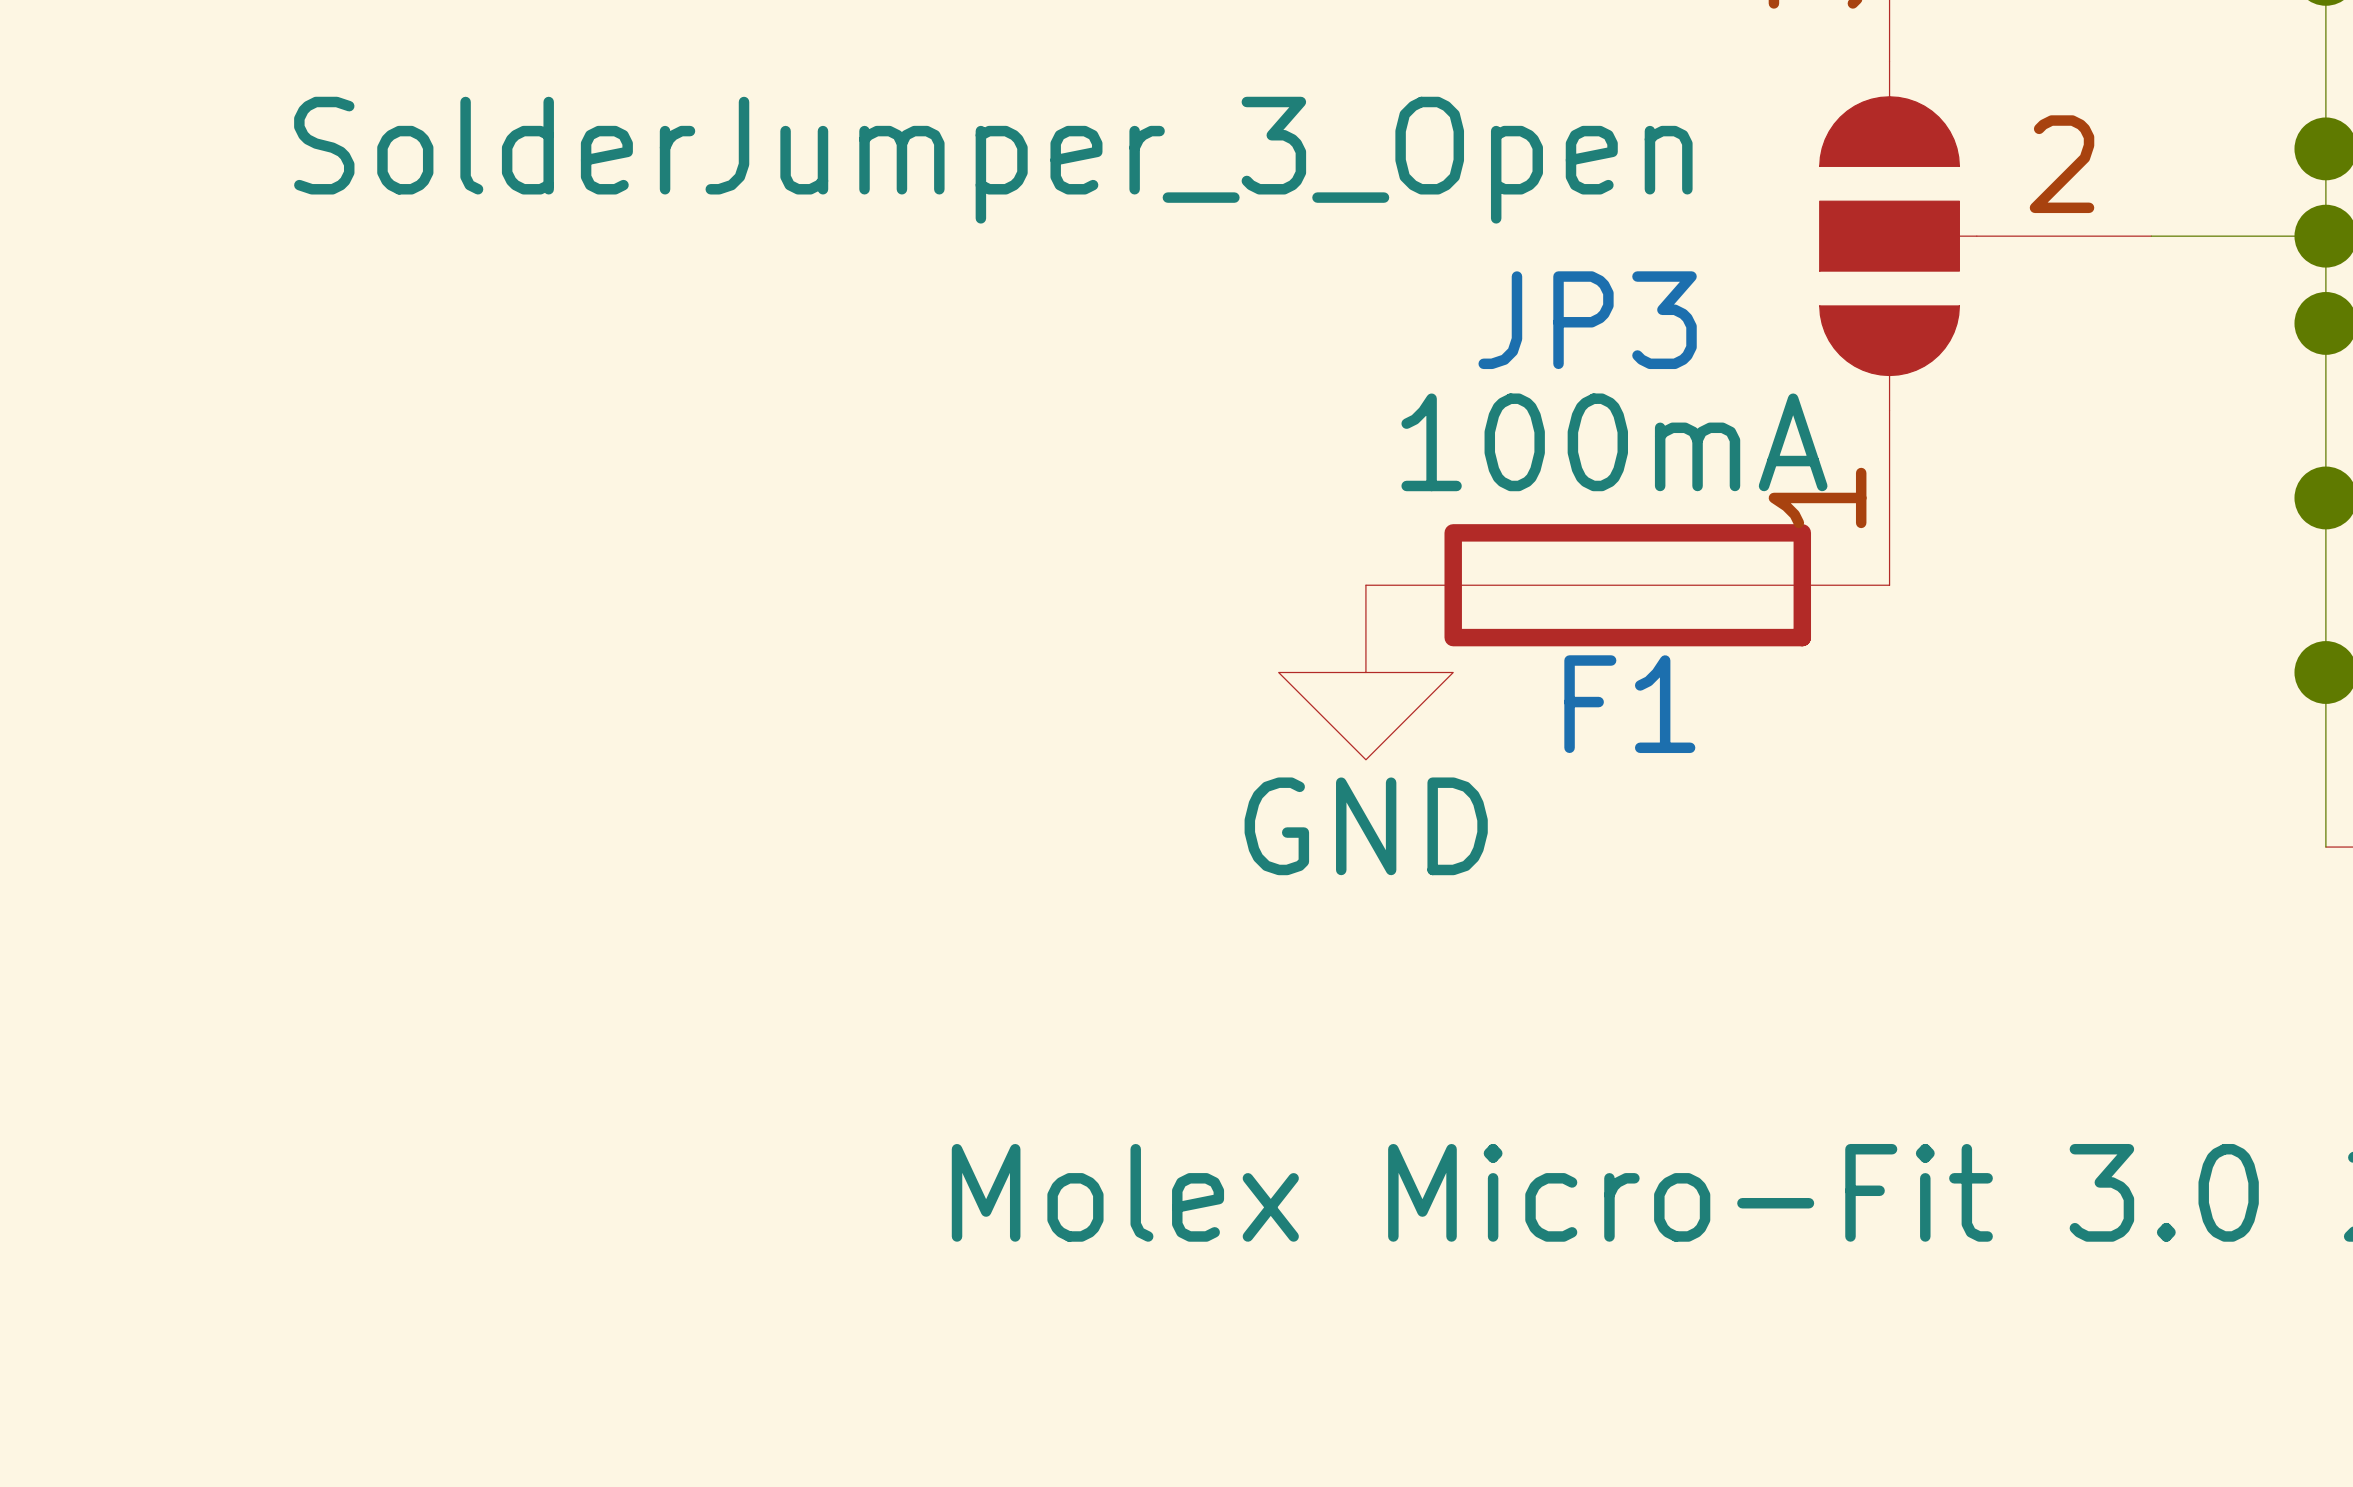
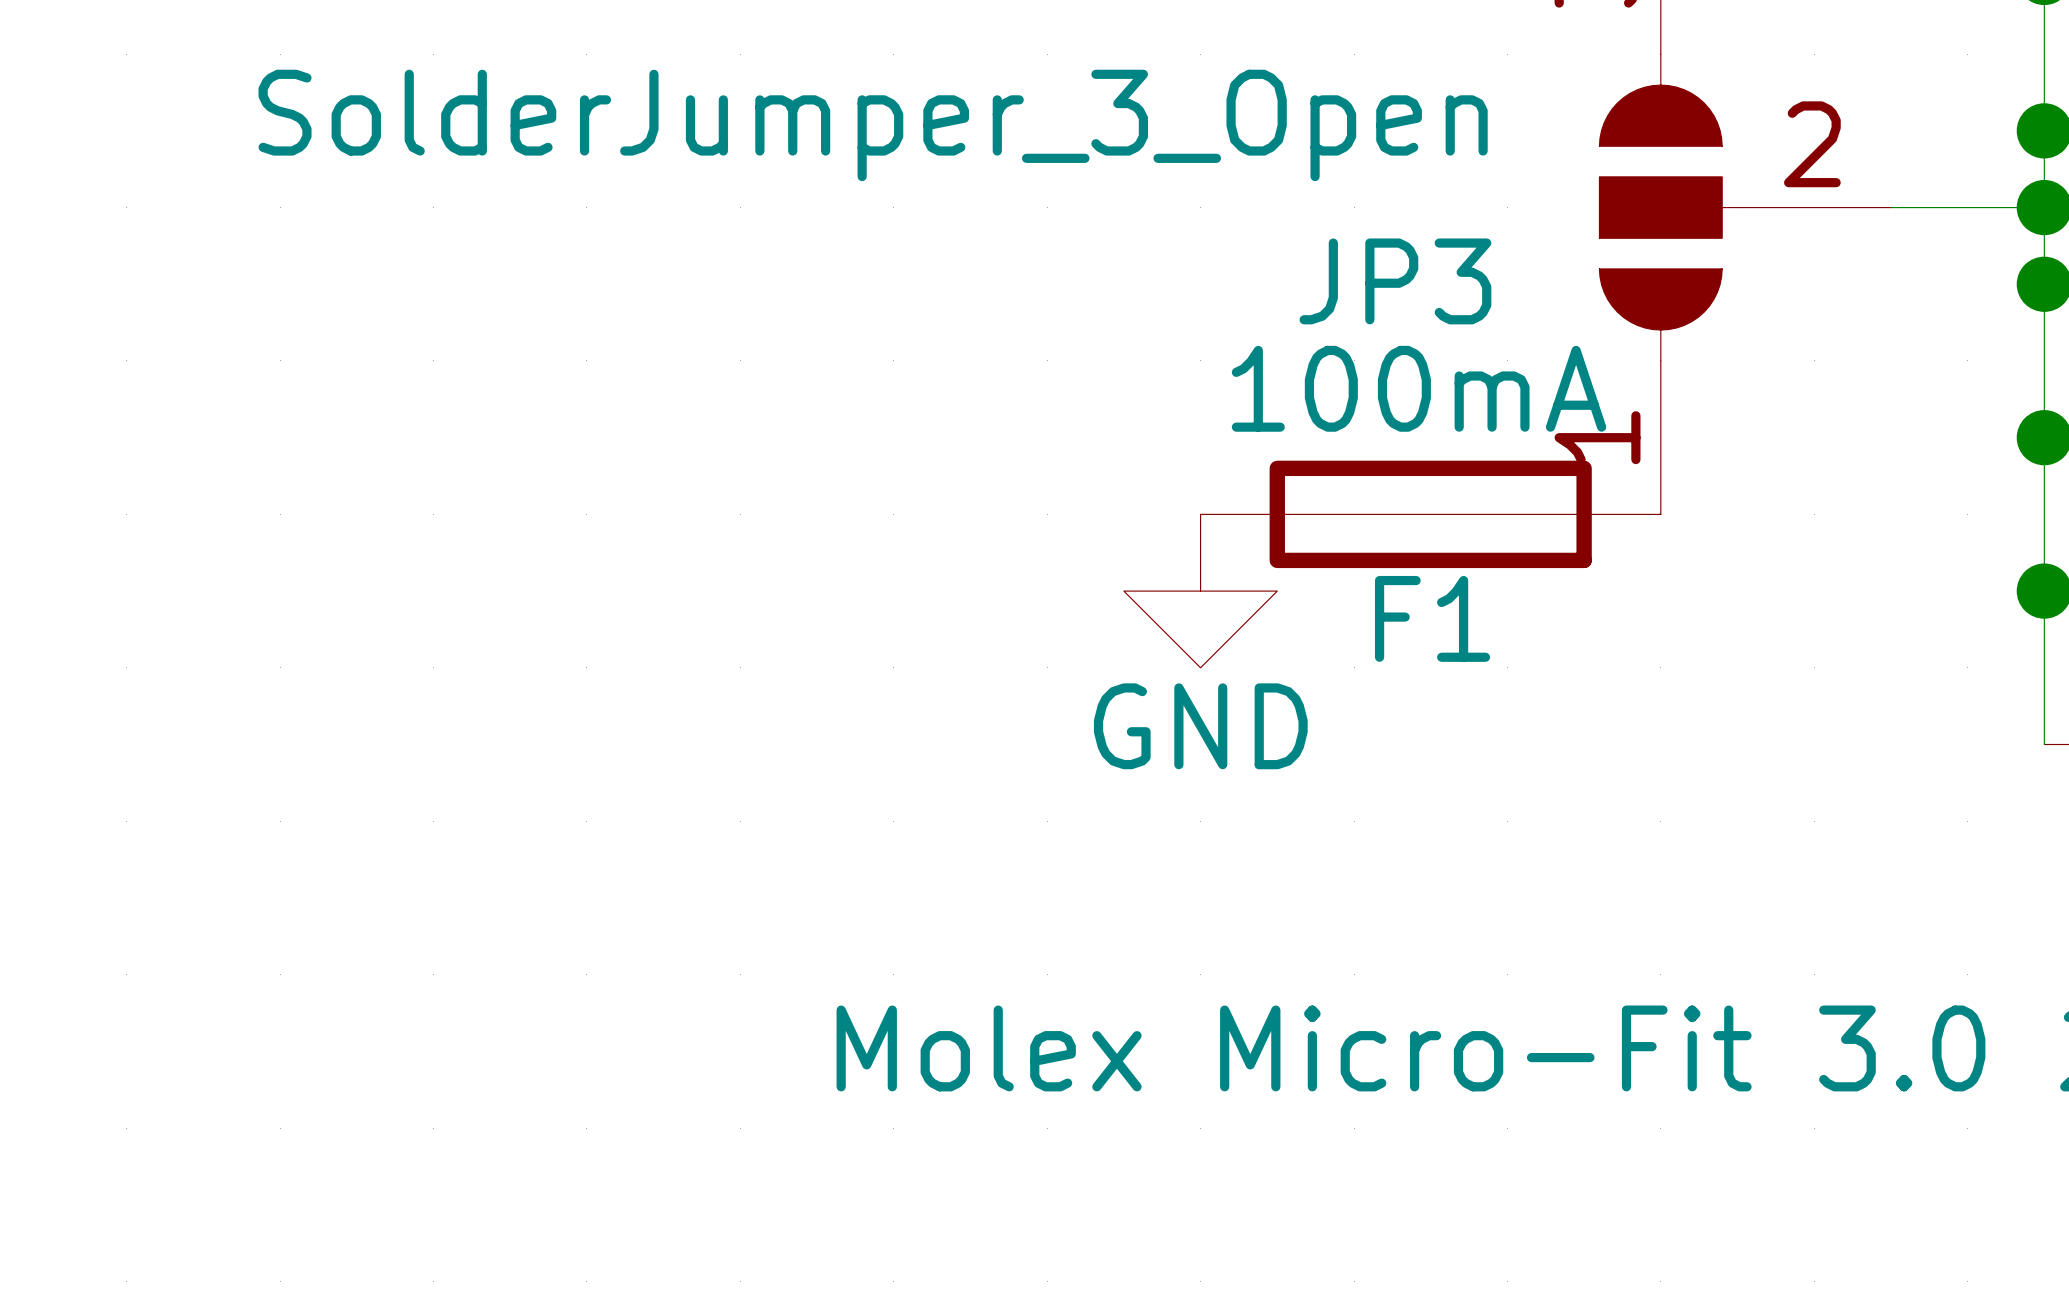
JP3 value position: SolderJumper_3_Open (993, 160) -> SolderJumper_3_Open (873, 125)

